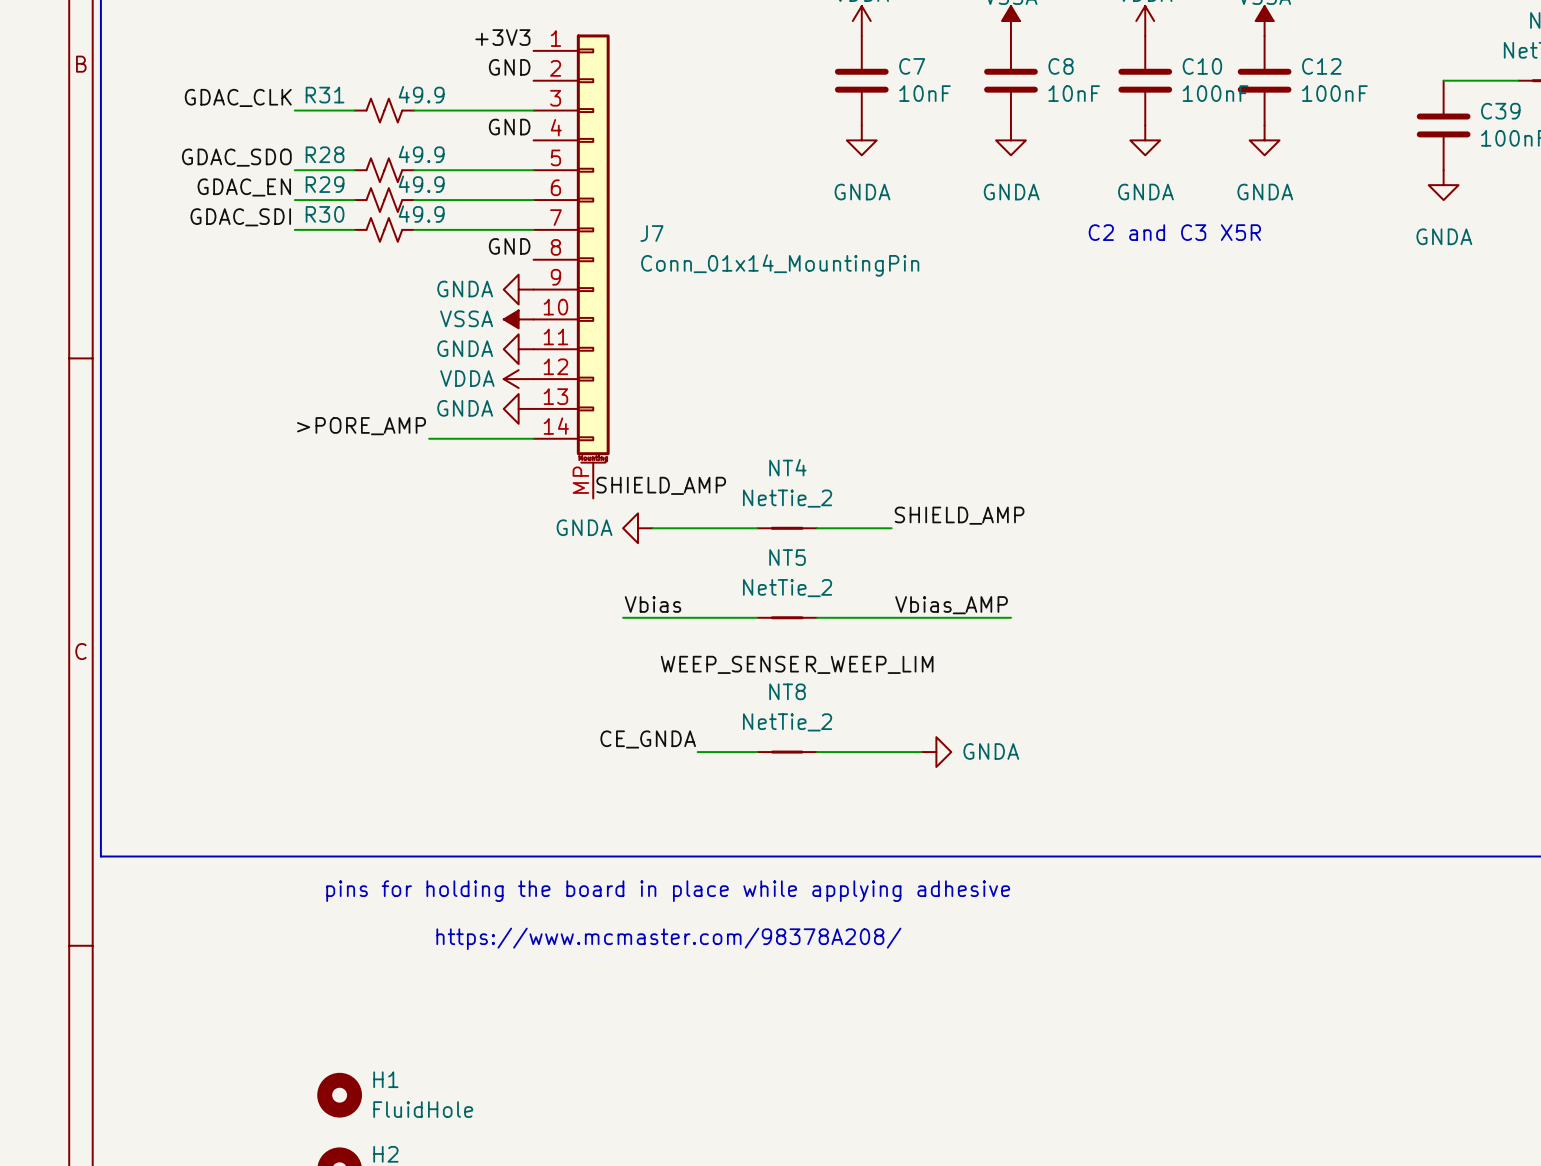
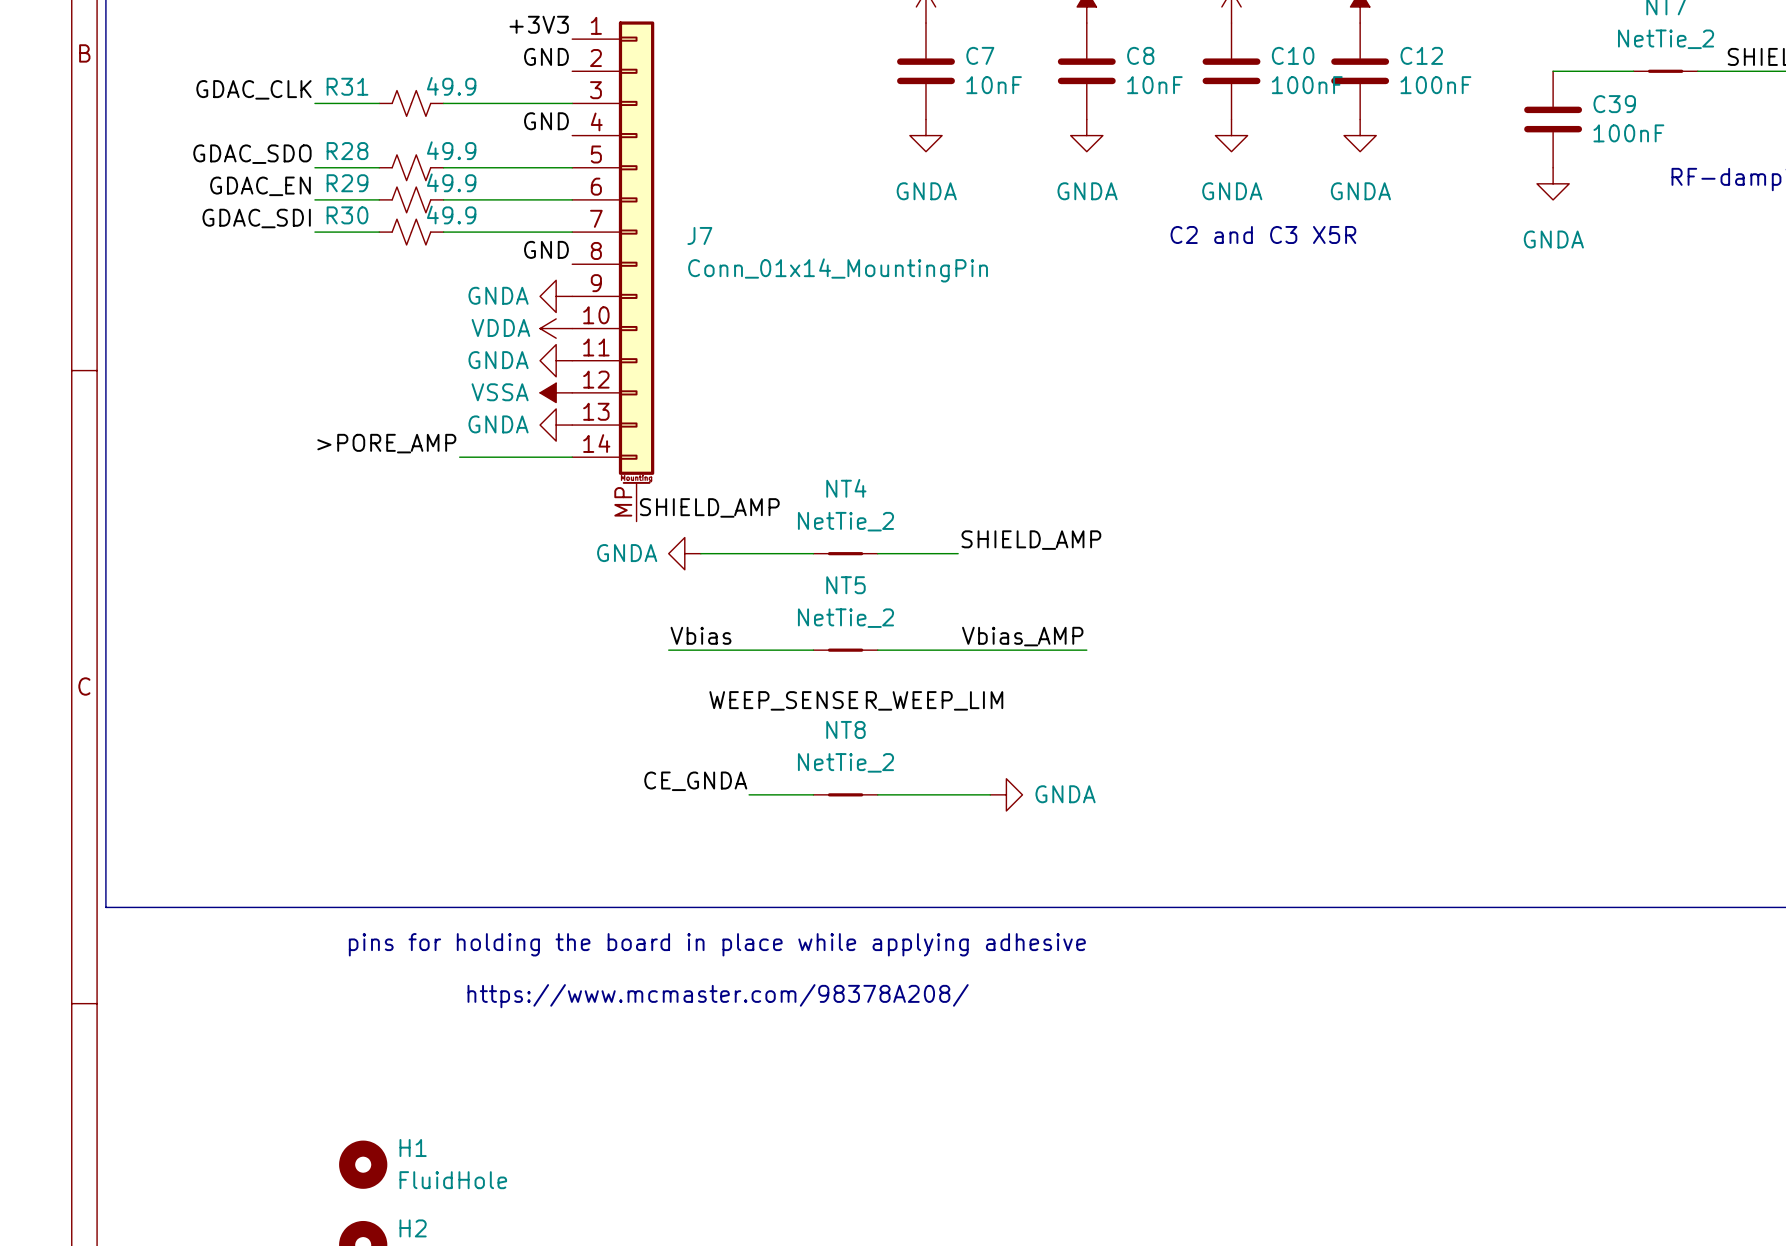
power symbol: VSSA (518, 319) -> VDDA (556, 328)
power symbol: VDDA (518, 379) -> VSSA (556, 392)

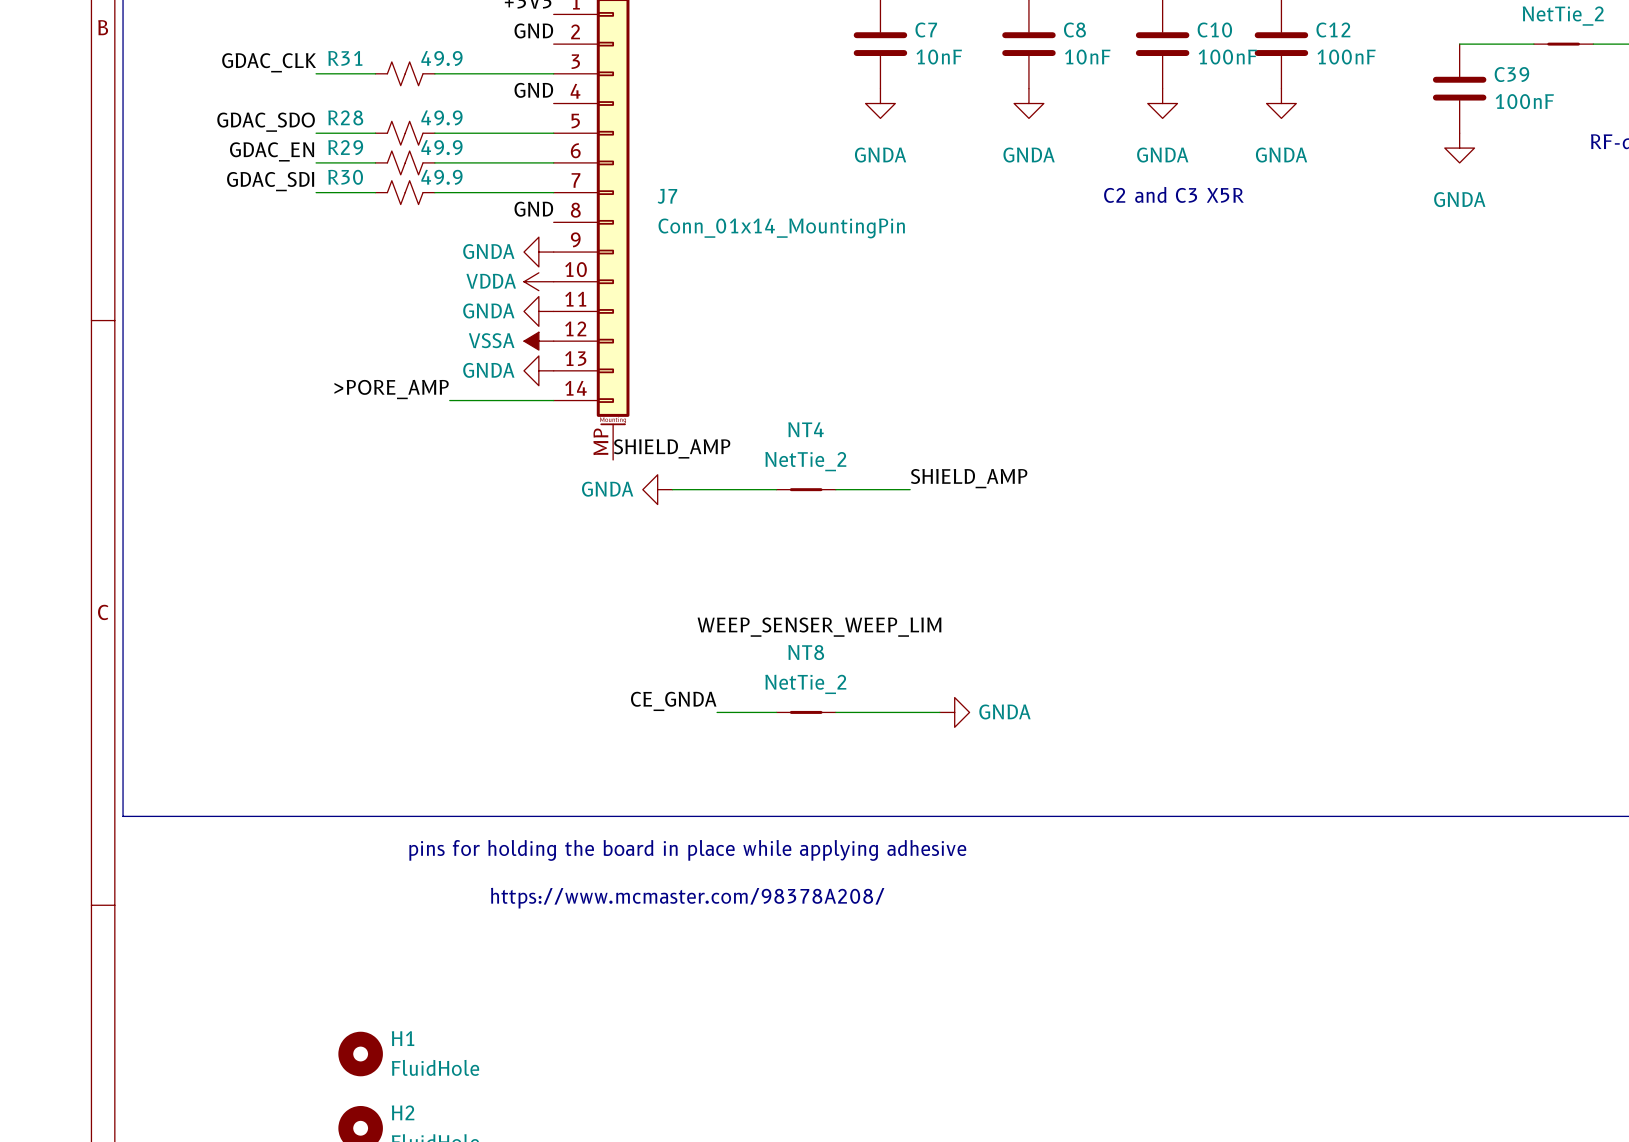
label: Vbias (701, 635) -> none
label: Vbias_AMP (1022, 636) -> none
wire: (668, 650) (813, 650) -> none
NT5: NetTie_2 (845, 650) -> none
wire: (877, 650) (1086, 650) -> none

